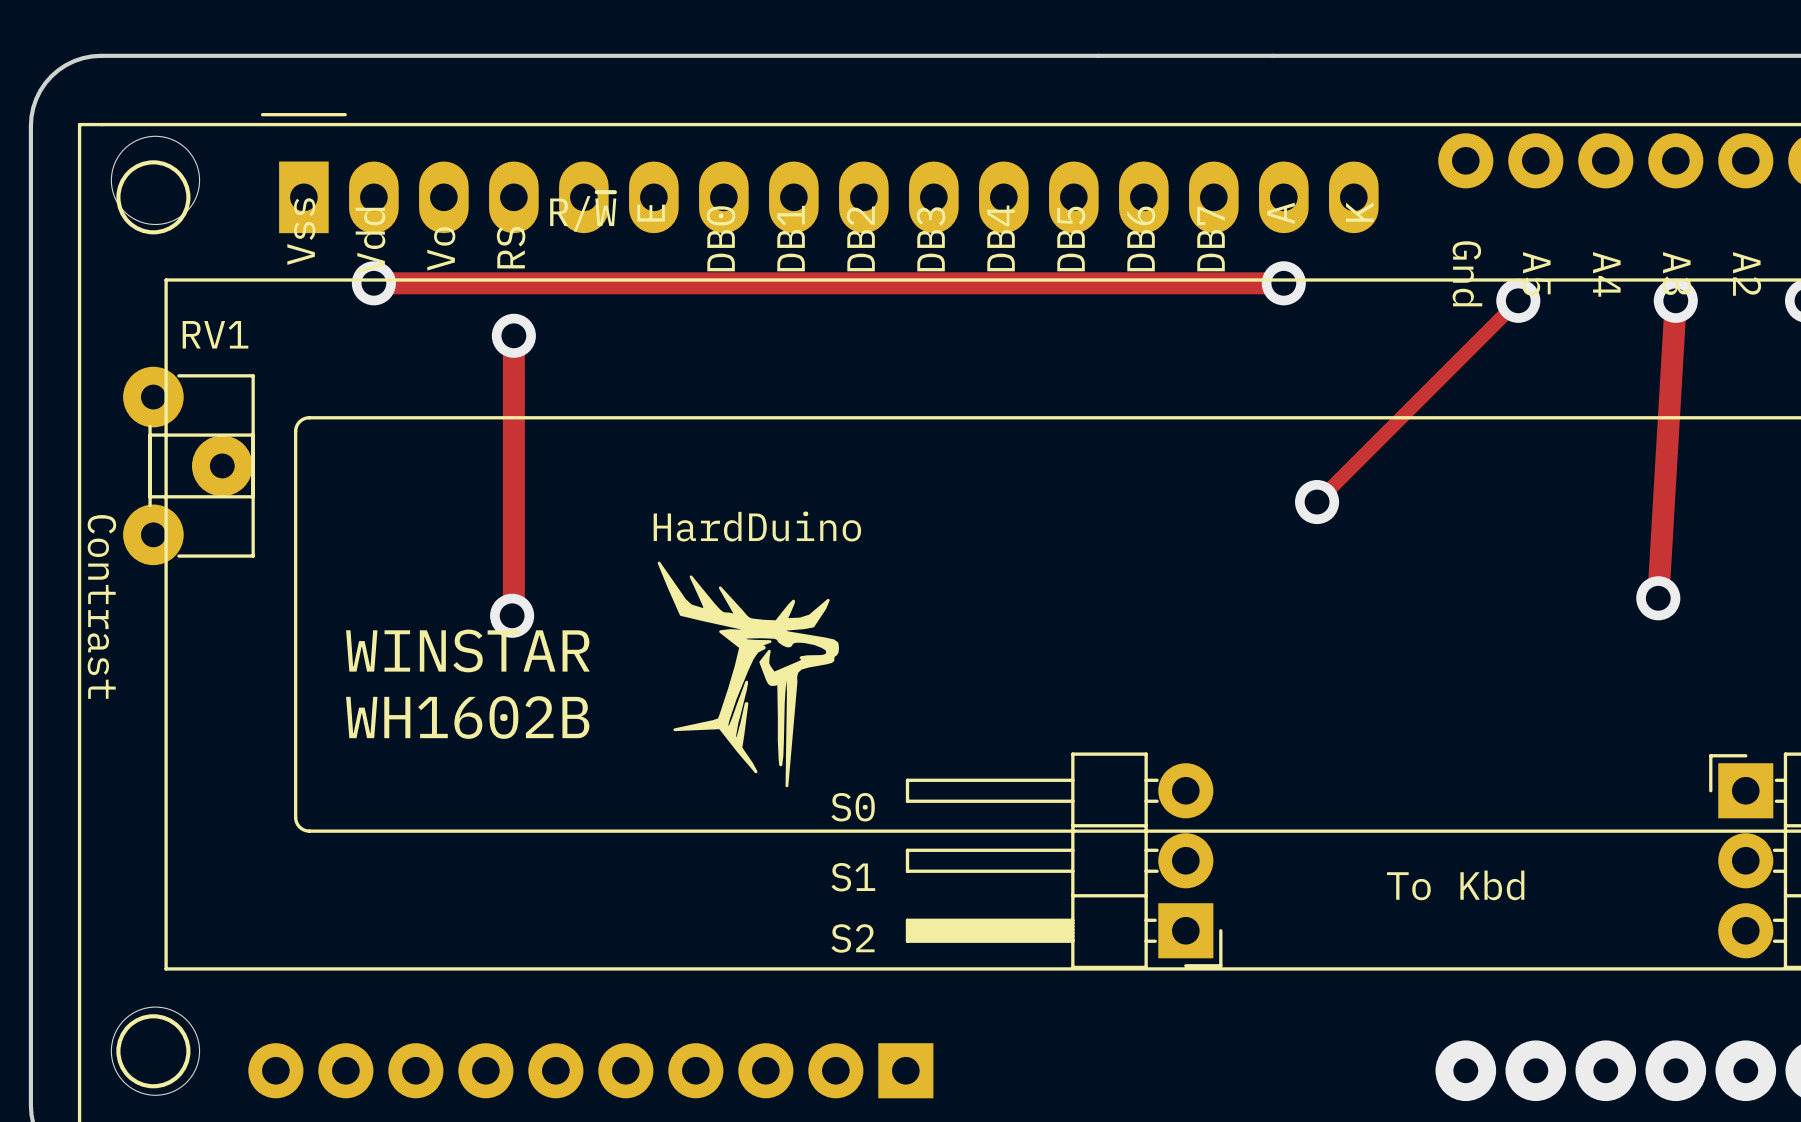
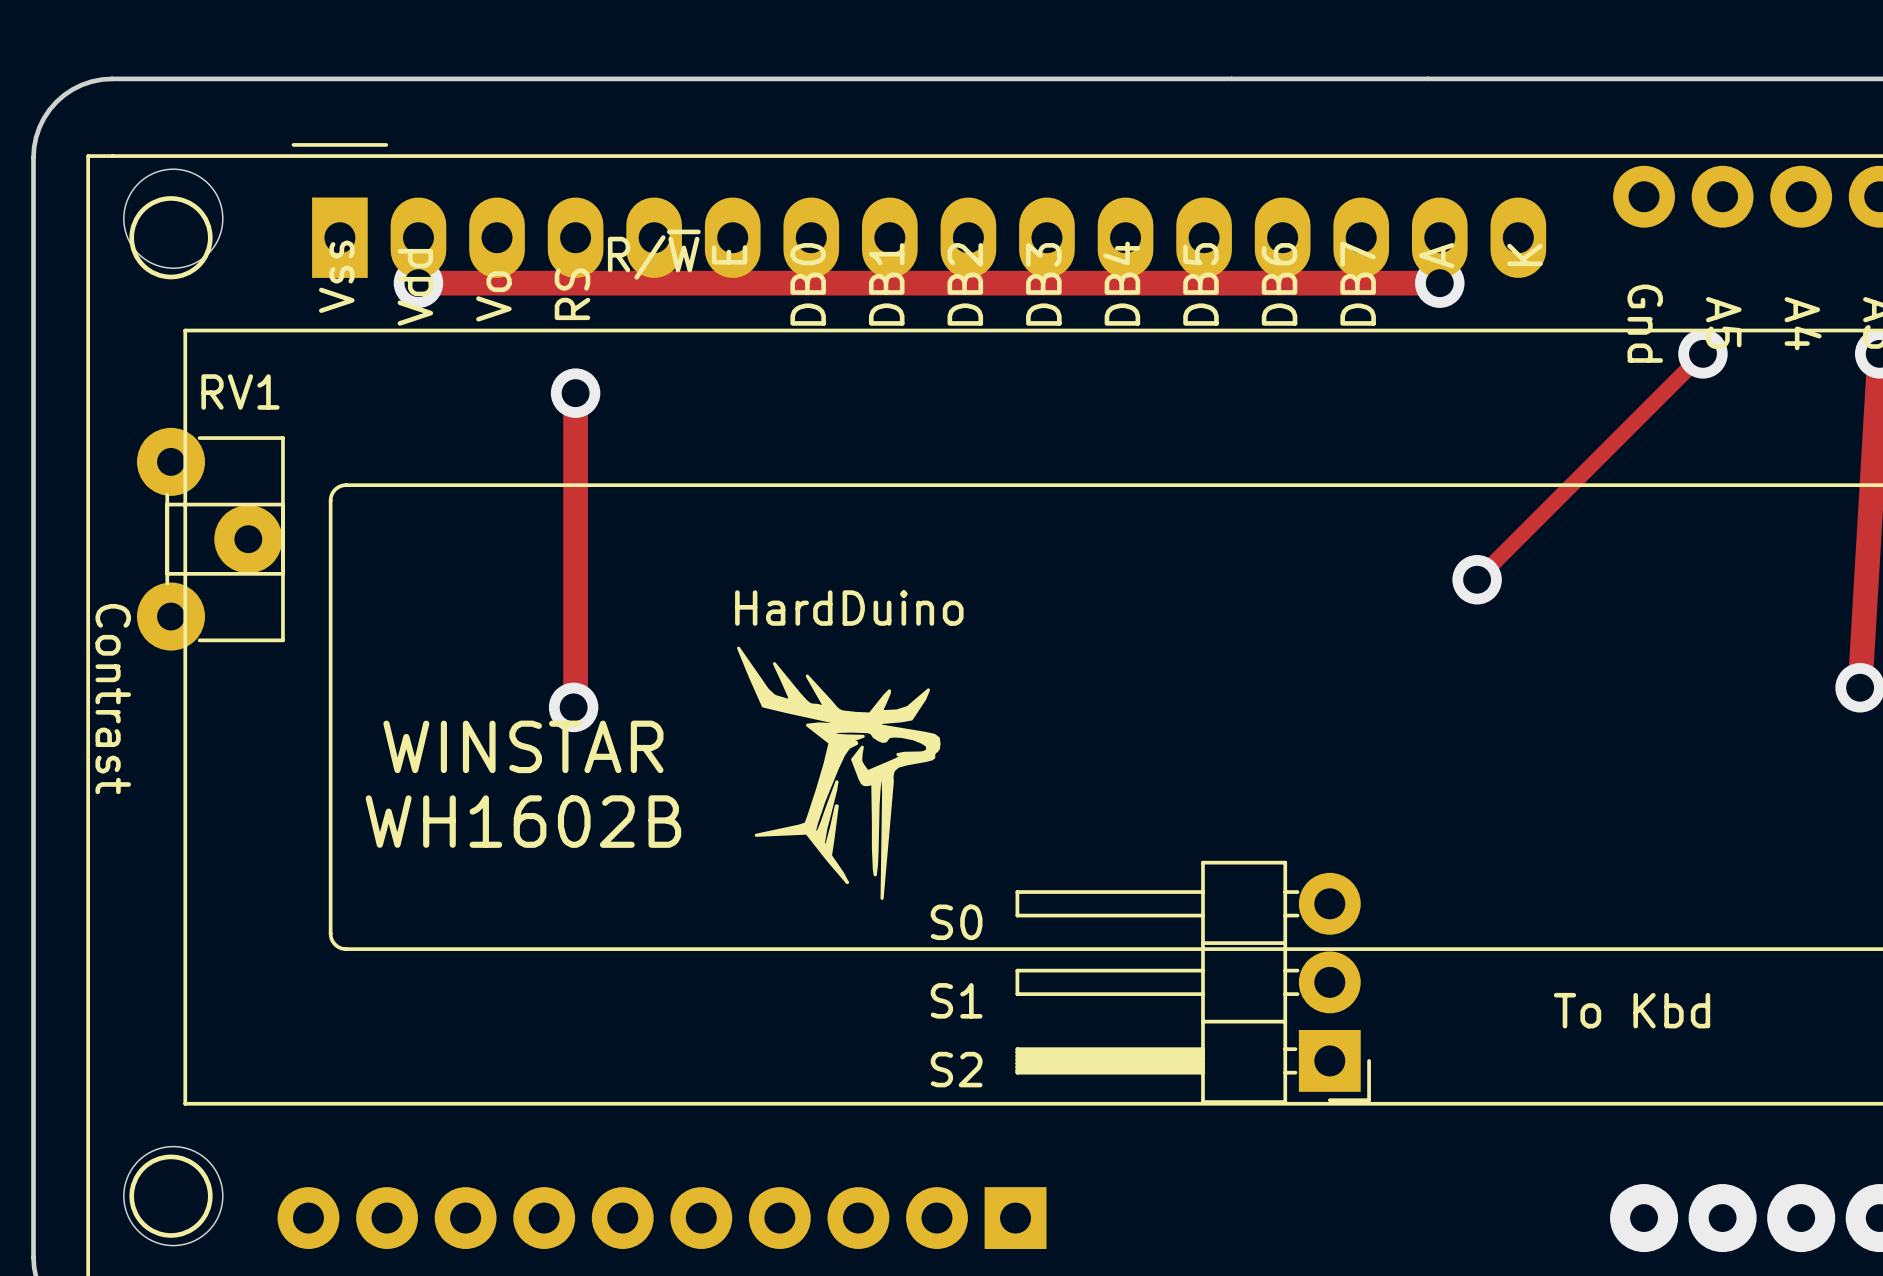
track: (373, 283) (1283, 283) -> (418, 283) (1439, 283)
via position: (373, 283) -> (418, 283)
via position: (1283, 283) -> (1439, 283)

